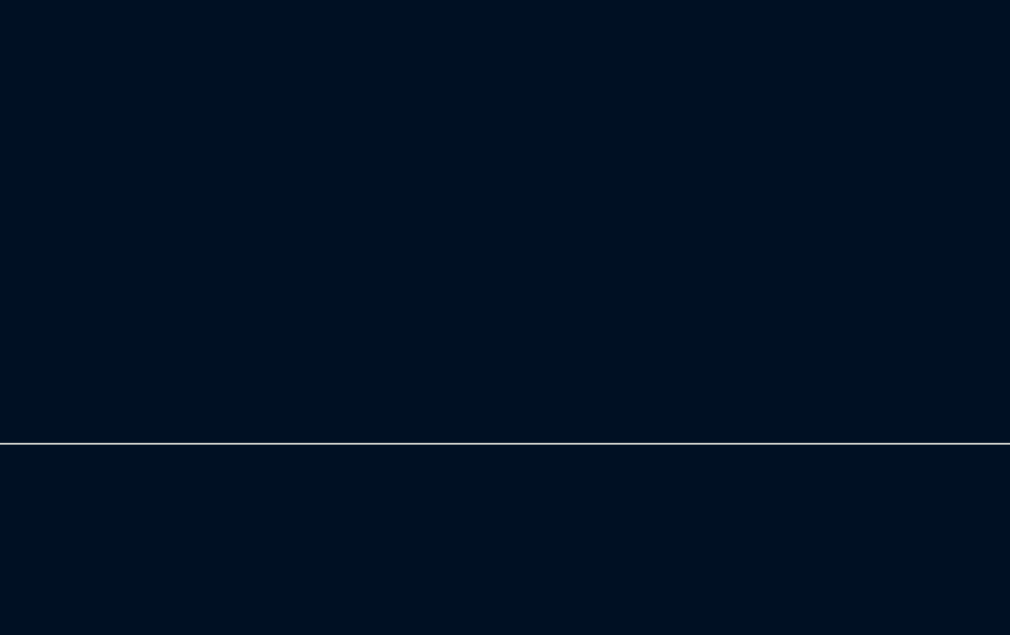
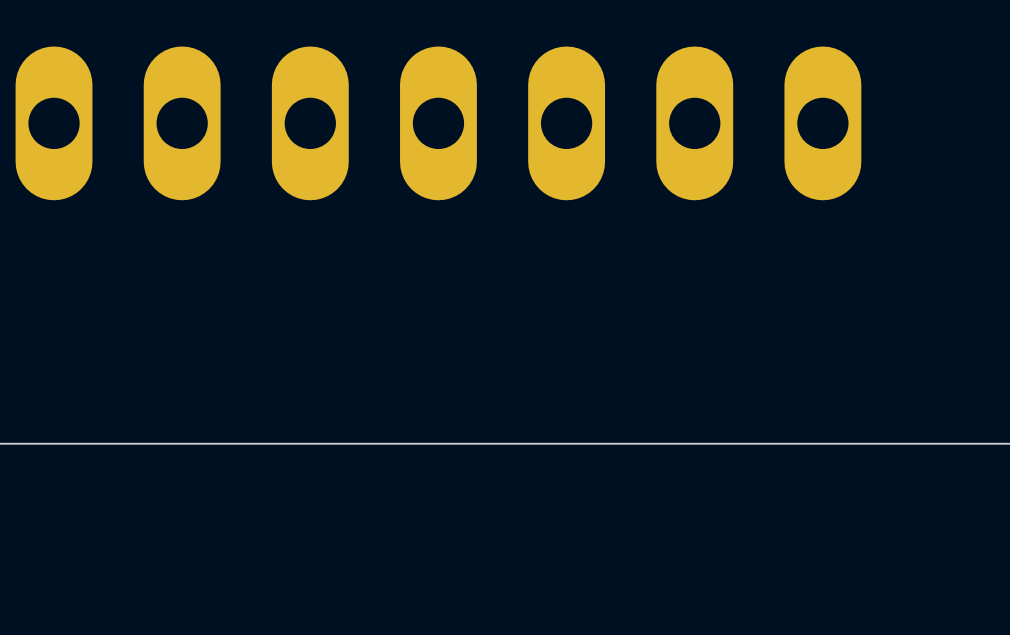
part: none -> (438, 123)

